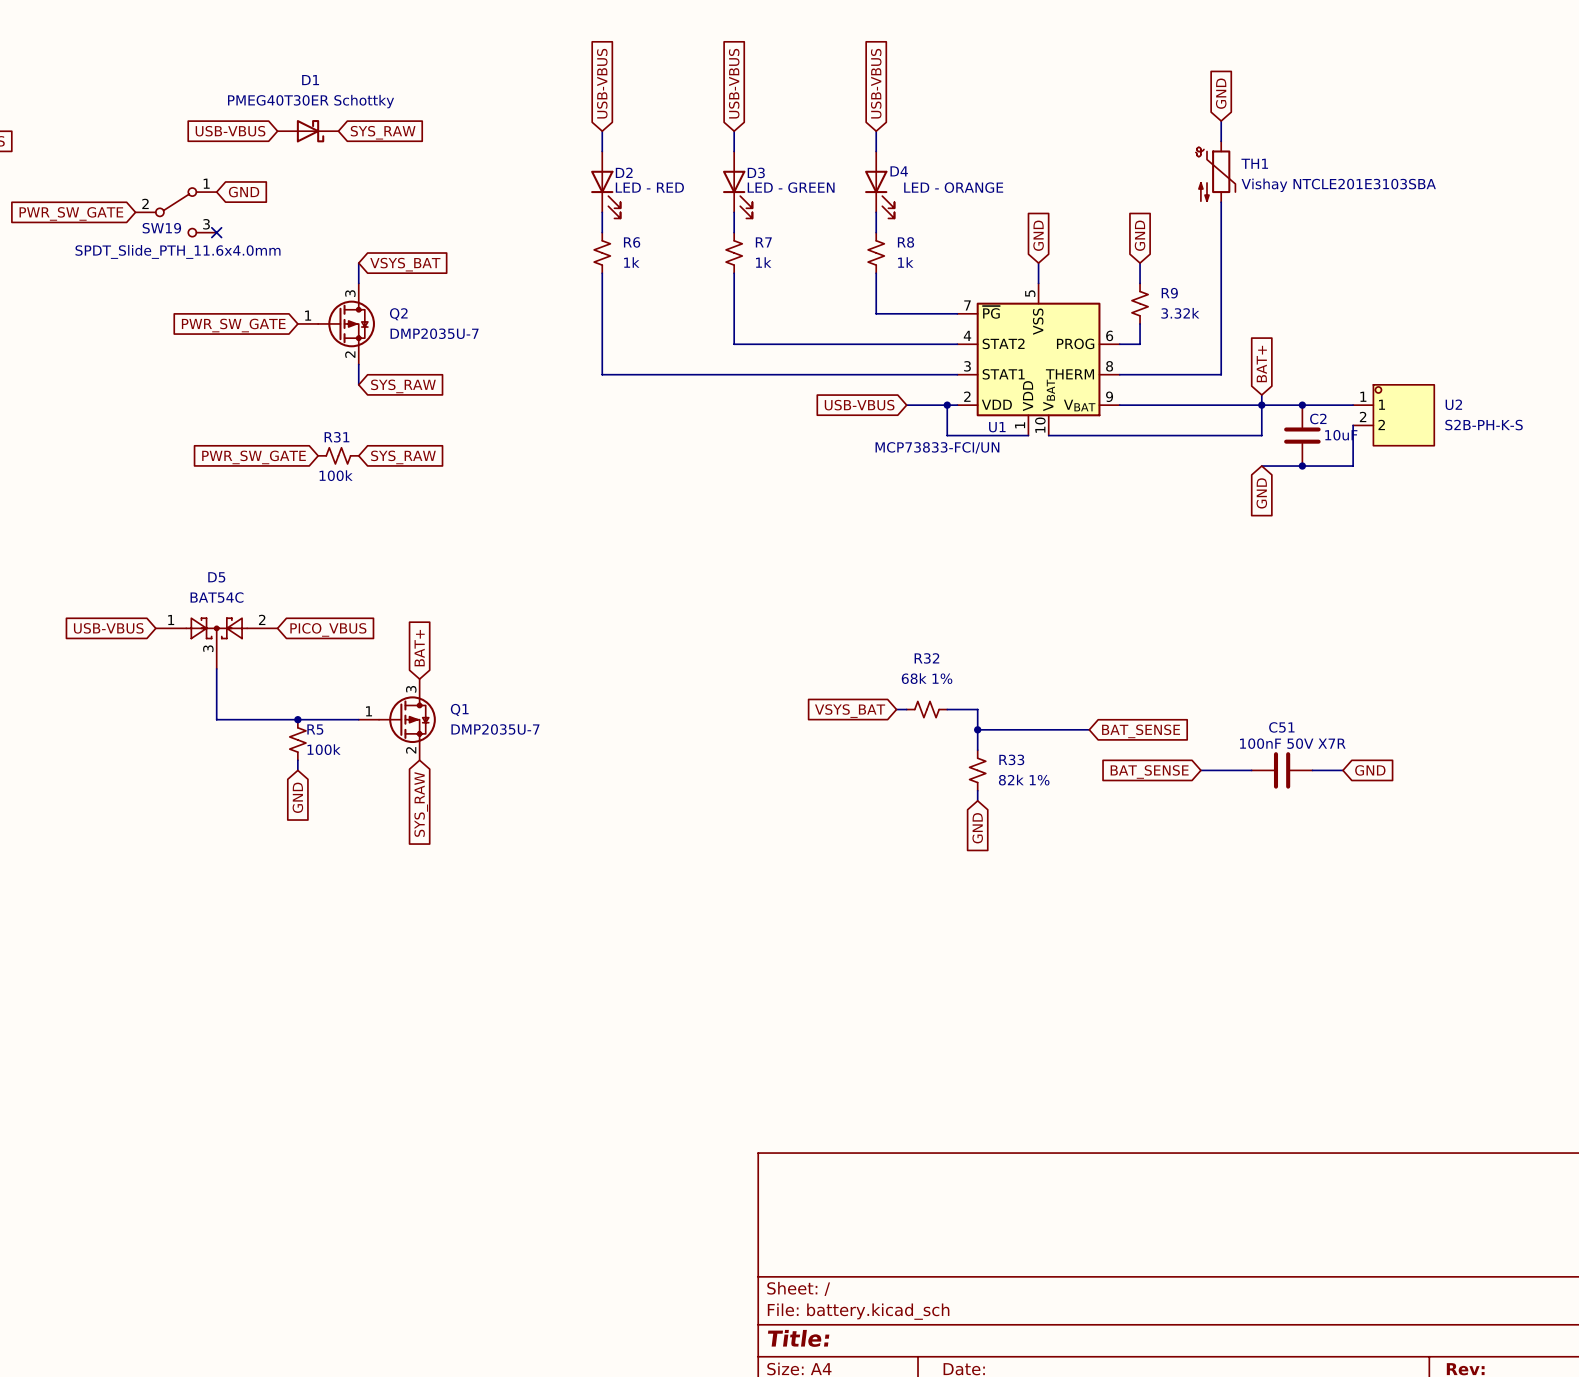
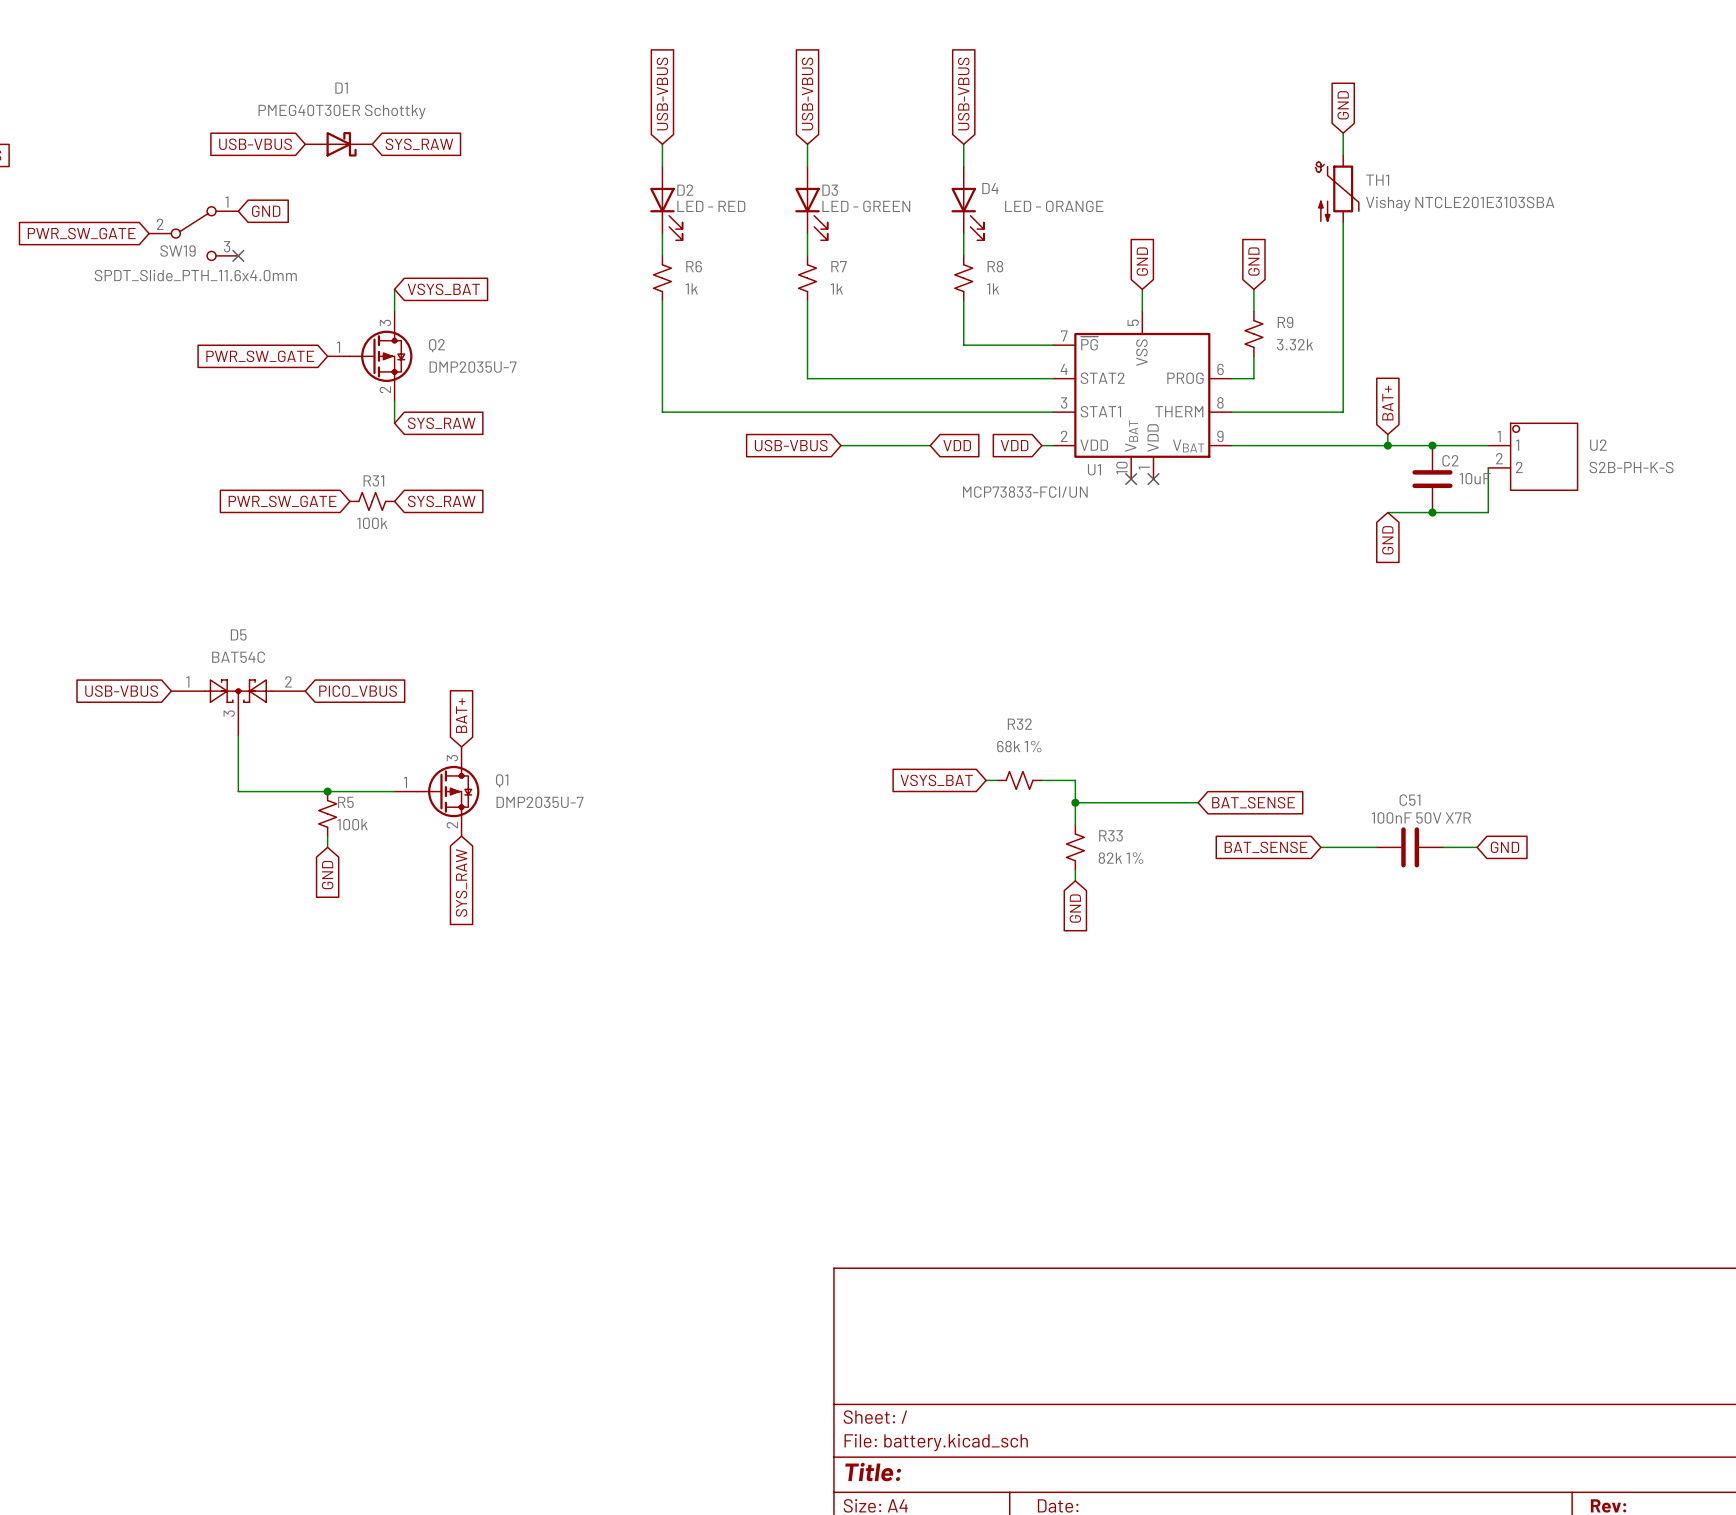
U1 pin name: VBAT (1049, 395) -> VDD (1153, 437)
U1 pin name: VDD (1028, 396) -> VBAT (1131, 436)
wire: none -> (840, 445) (930, 445)
global label position: USB-VBUS (859, 405) -> USB-VBUS (791, 445)
global label: none -> VDD (957, 445)
wire: (906, 405) (947, 405) (947, 435) (1028, 435) -> none
global label: none -> VDD (1014, 445)
junction: (947, 405) -> none
wire: (1261, 405) (1261, 435) (1048, 435) -> none
U1 pin number: 1 (1020, 425) -> 10 (1121, 468)
U1 pin number: 10 (1040, 425) -> 1 (1144, 468)
no-connect mark: none -> (1131, 479)
no-connect mark: none -> (1153, 479)

